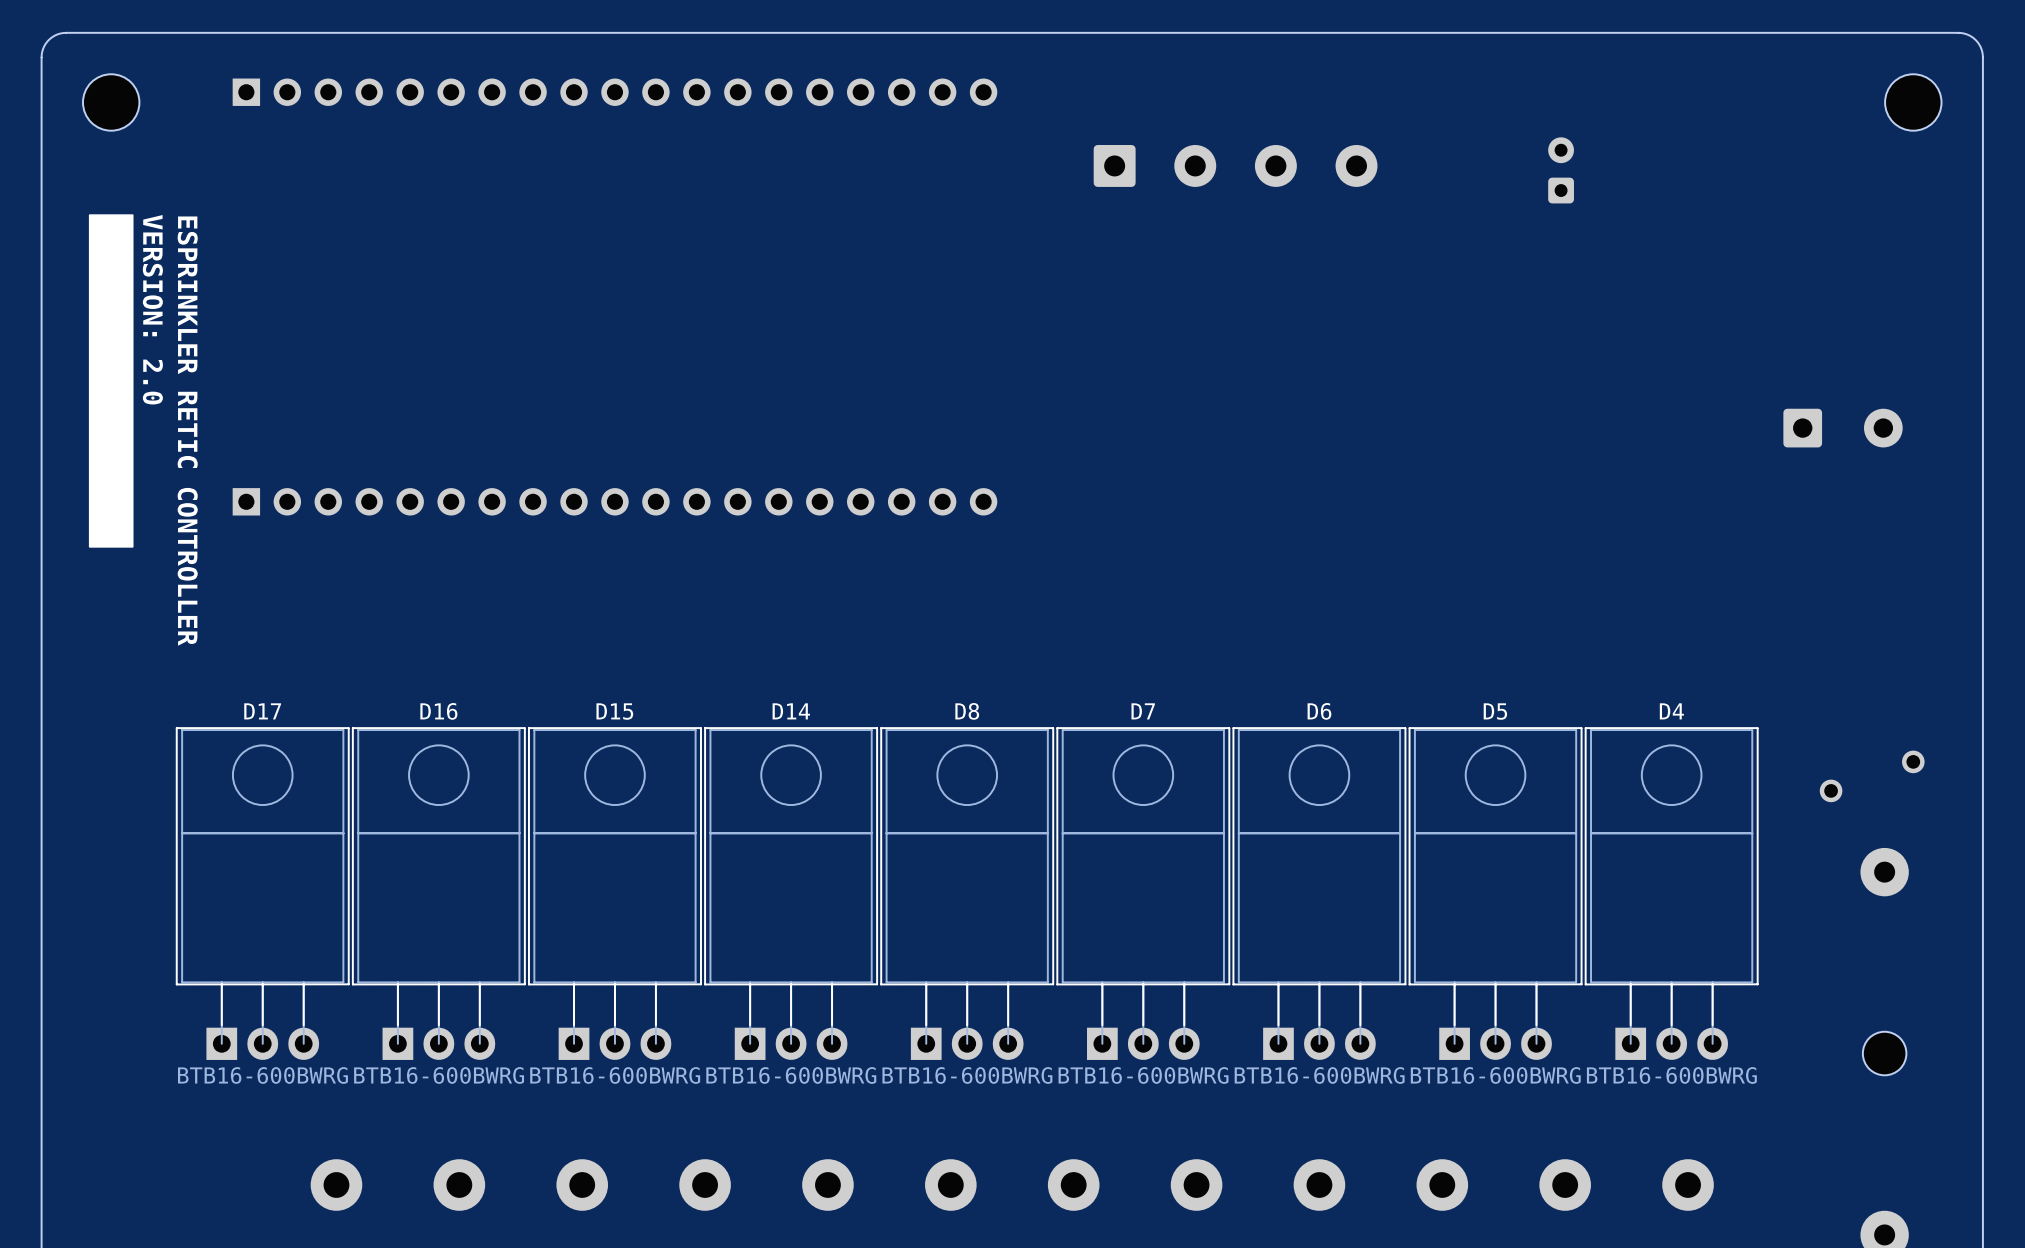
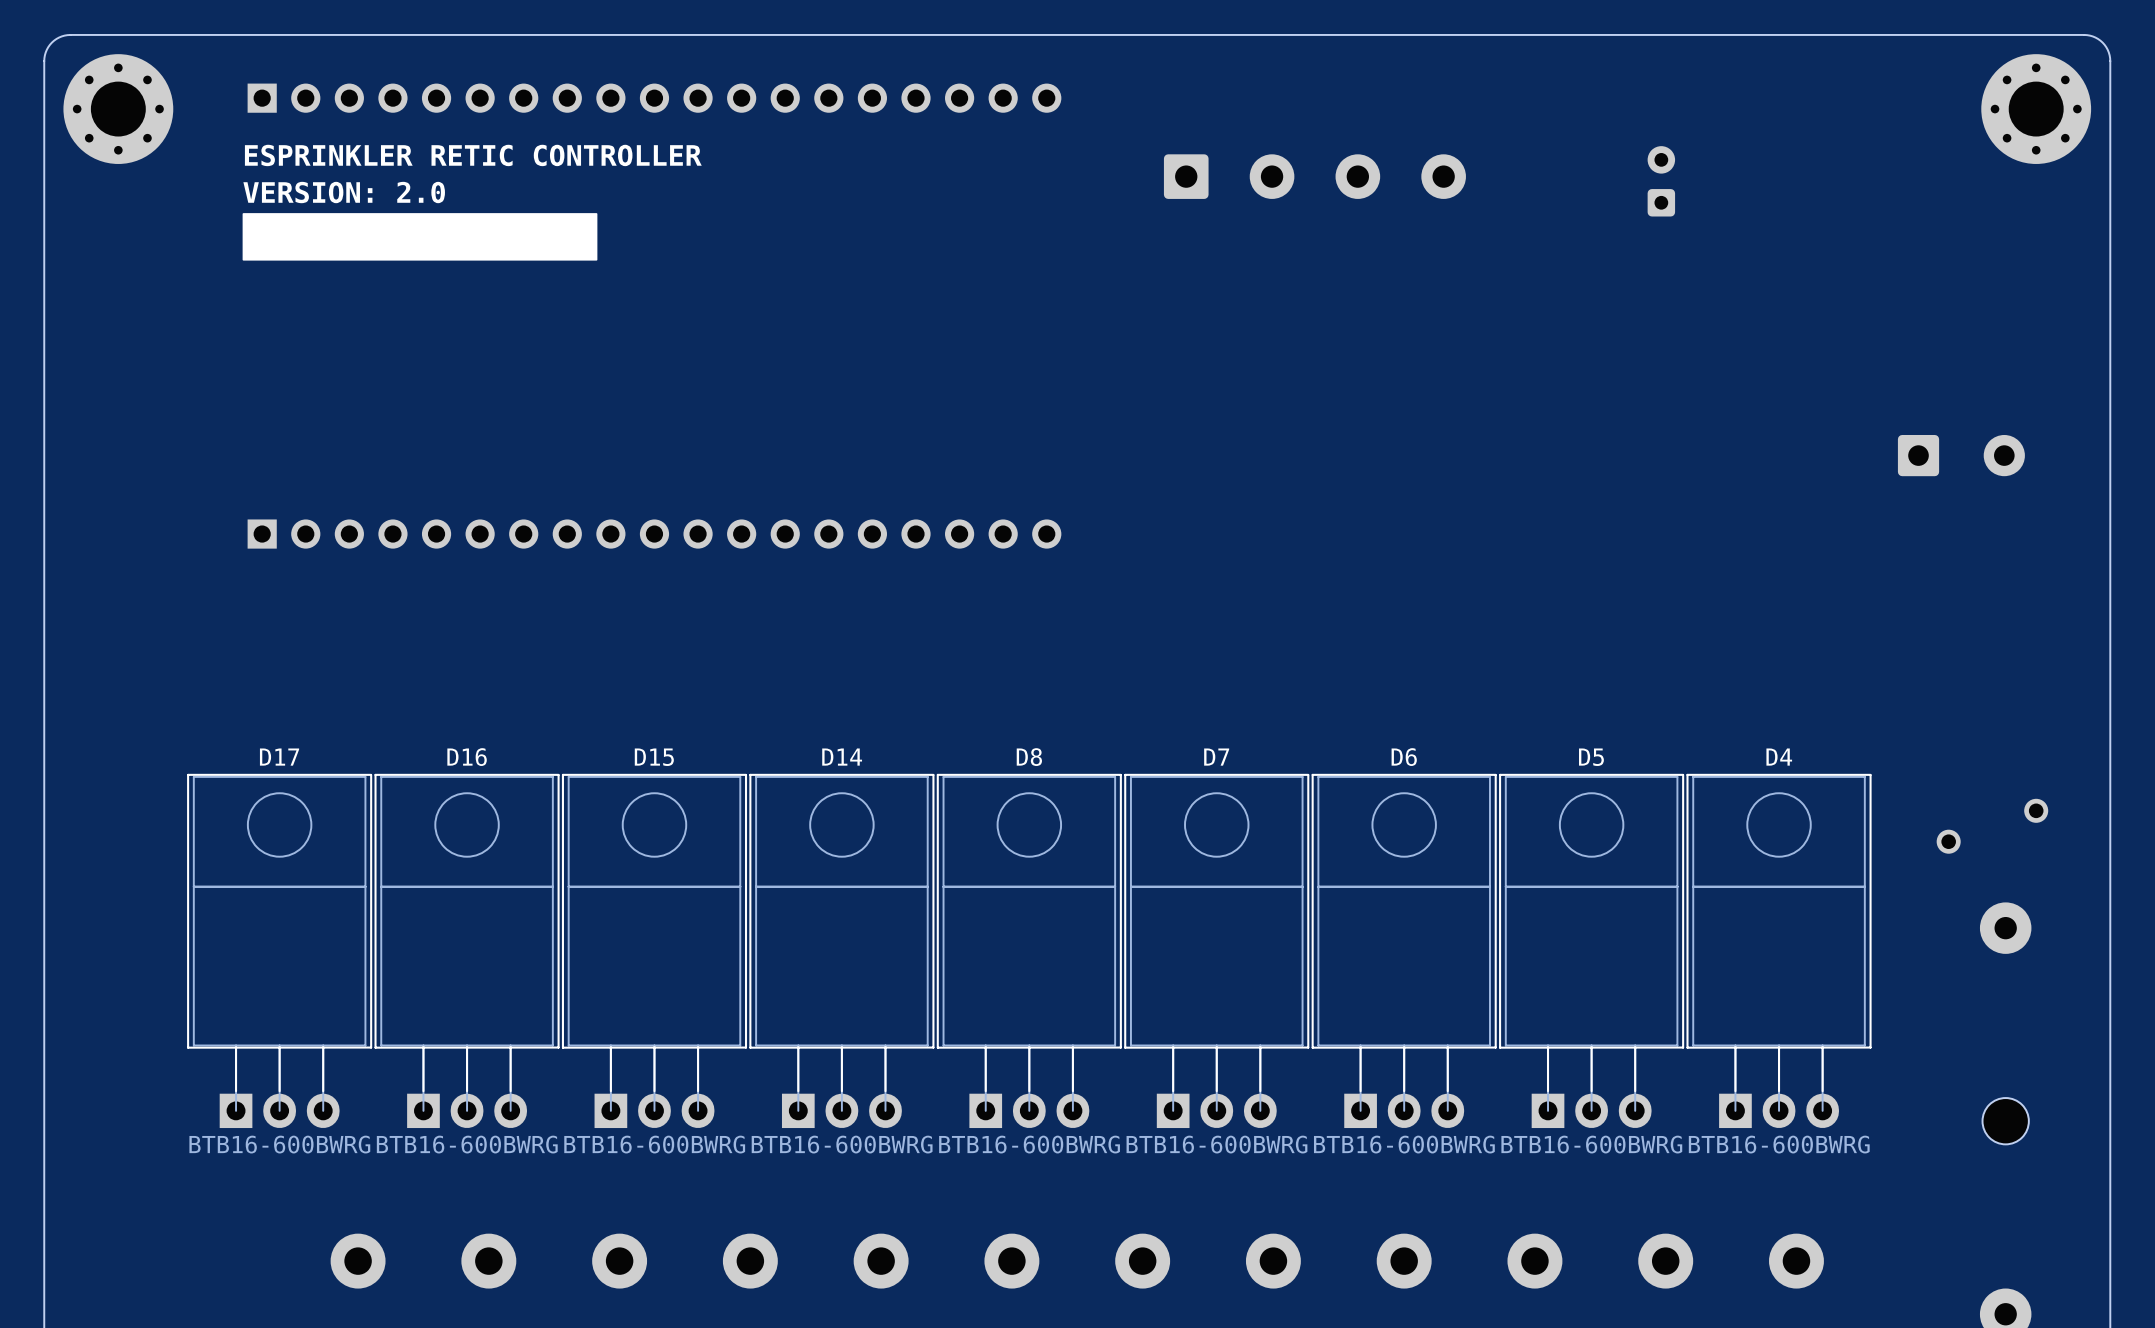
part footprint: [82, 74, 140, 131] -> [63, 54, 174, 164]
part footprint: [1885, 74, 1942, 131] -> [1981, 54, 2092, 164]
drawing: none -> [242, 213, 598, 261]
drawing: [88, 214, 134, 548] -> none
text rotation: 0° (152, 309) -> 90° counterclockwise (344, 192)
text position: VERSION: 2.0 (152, 309) -> VERSION: 2.0 (344, 192)
text rotation: 0° (187, 431) -> 90° counterclockwise (473, 155)

